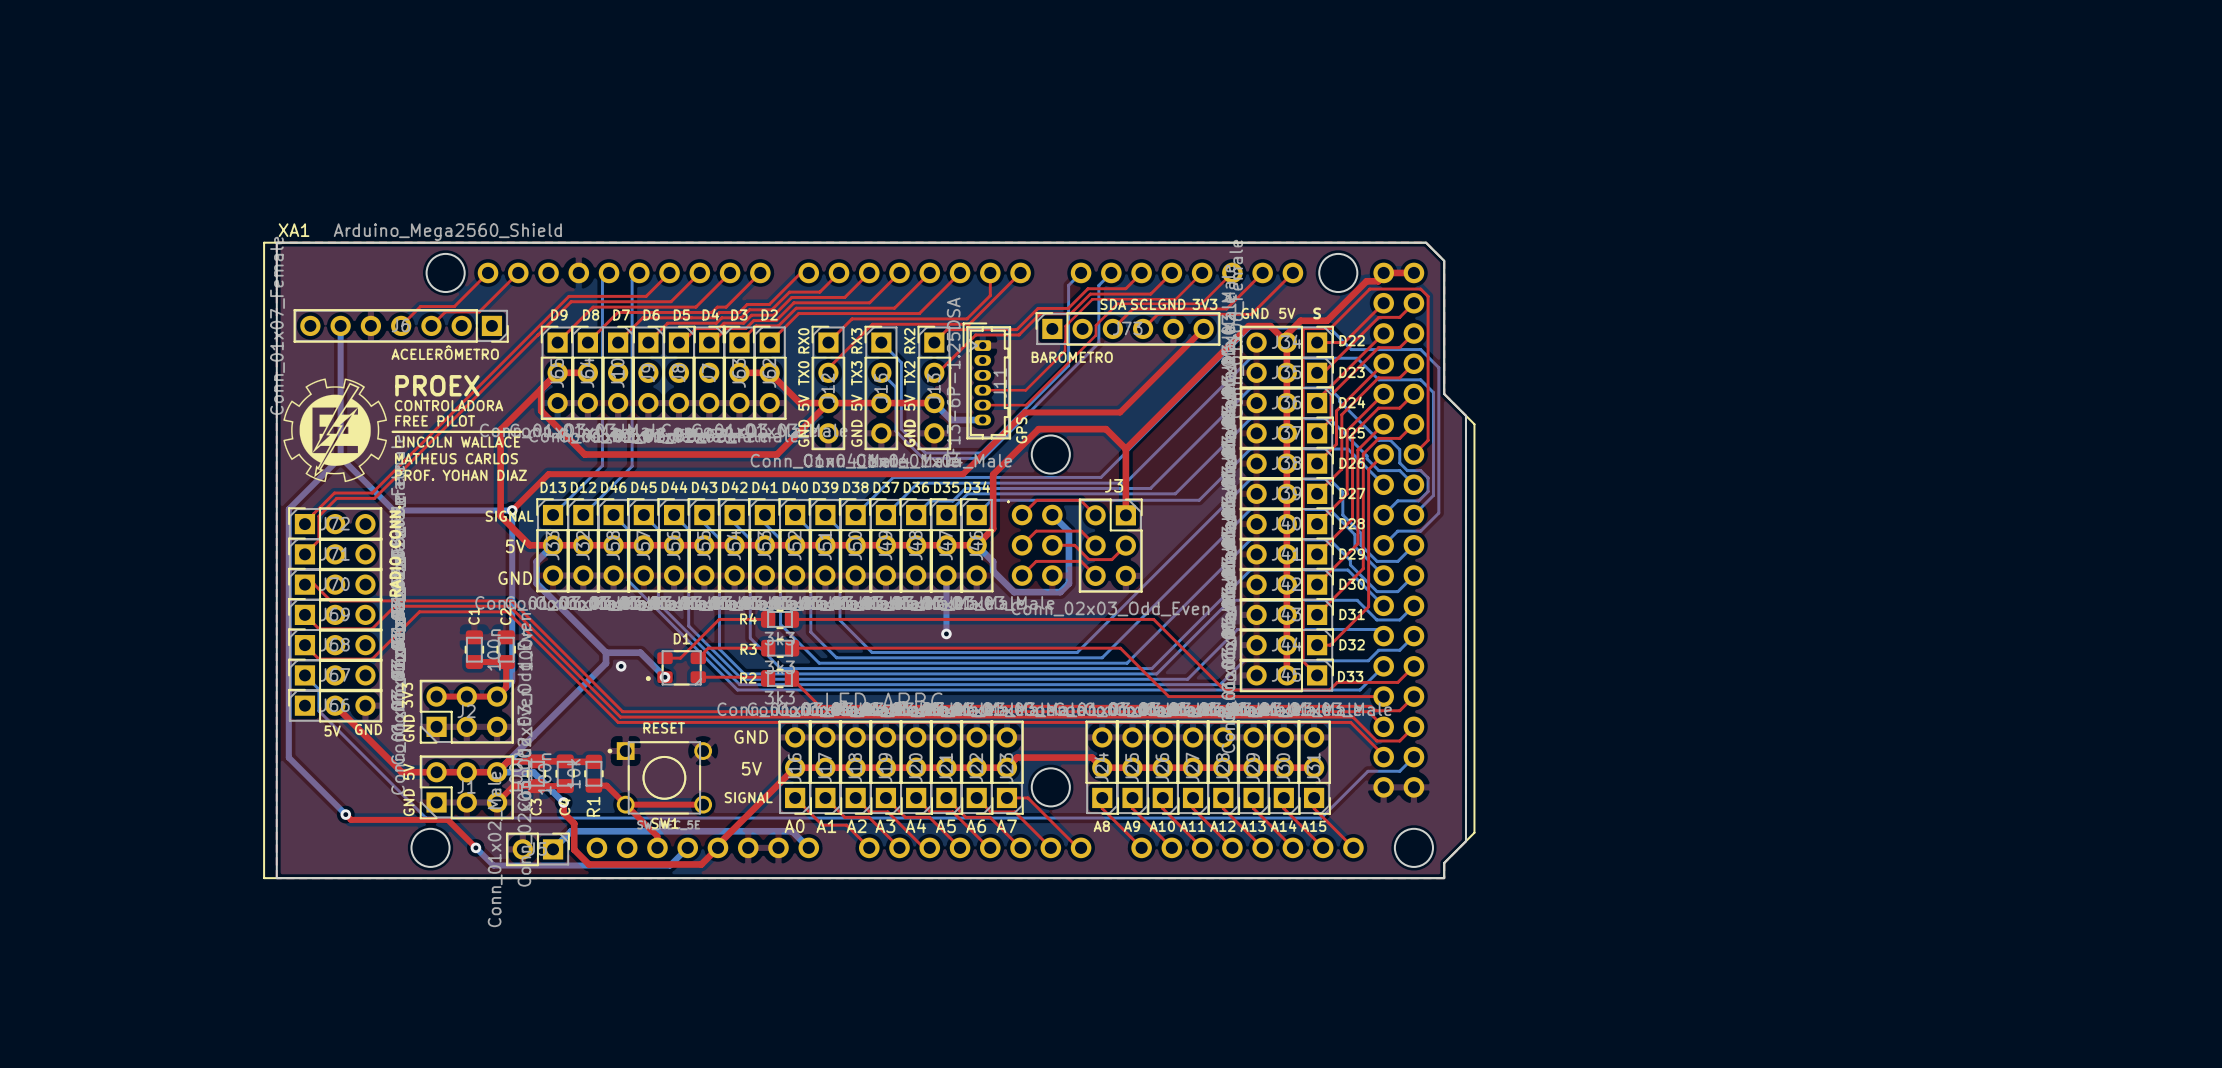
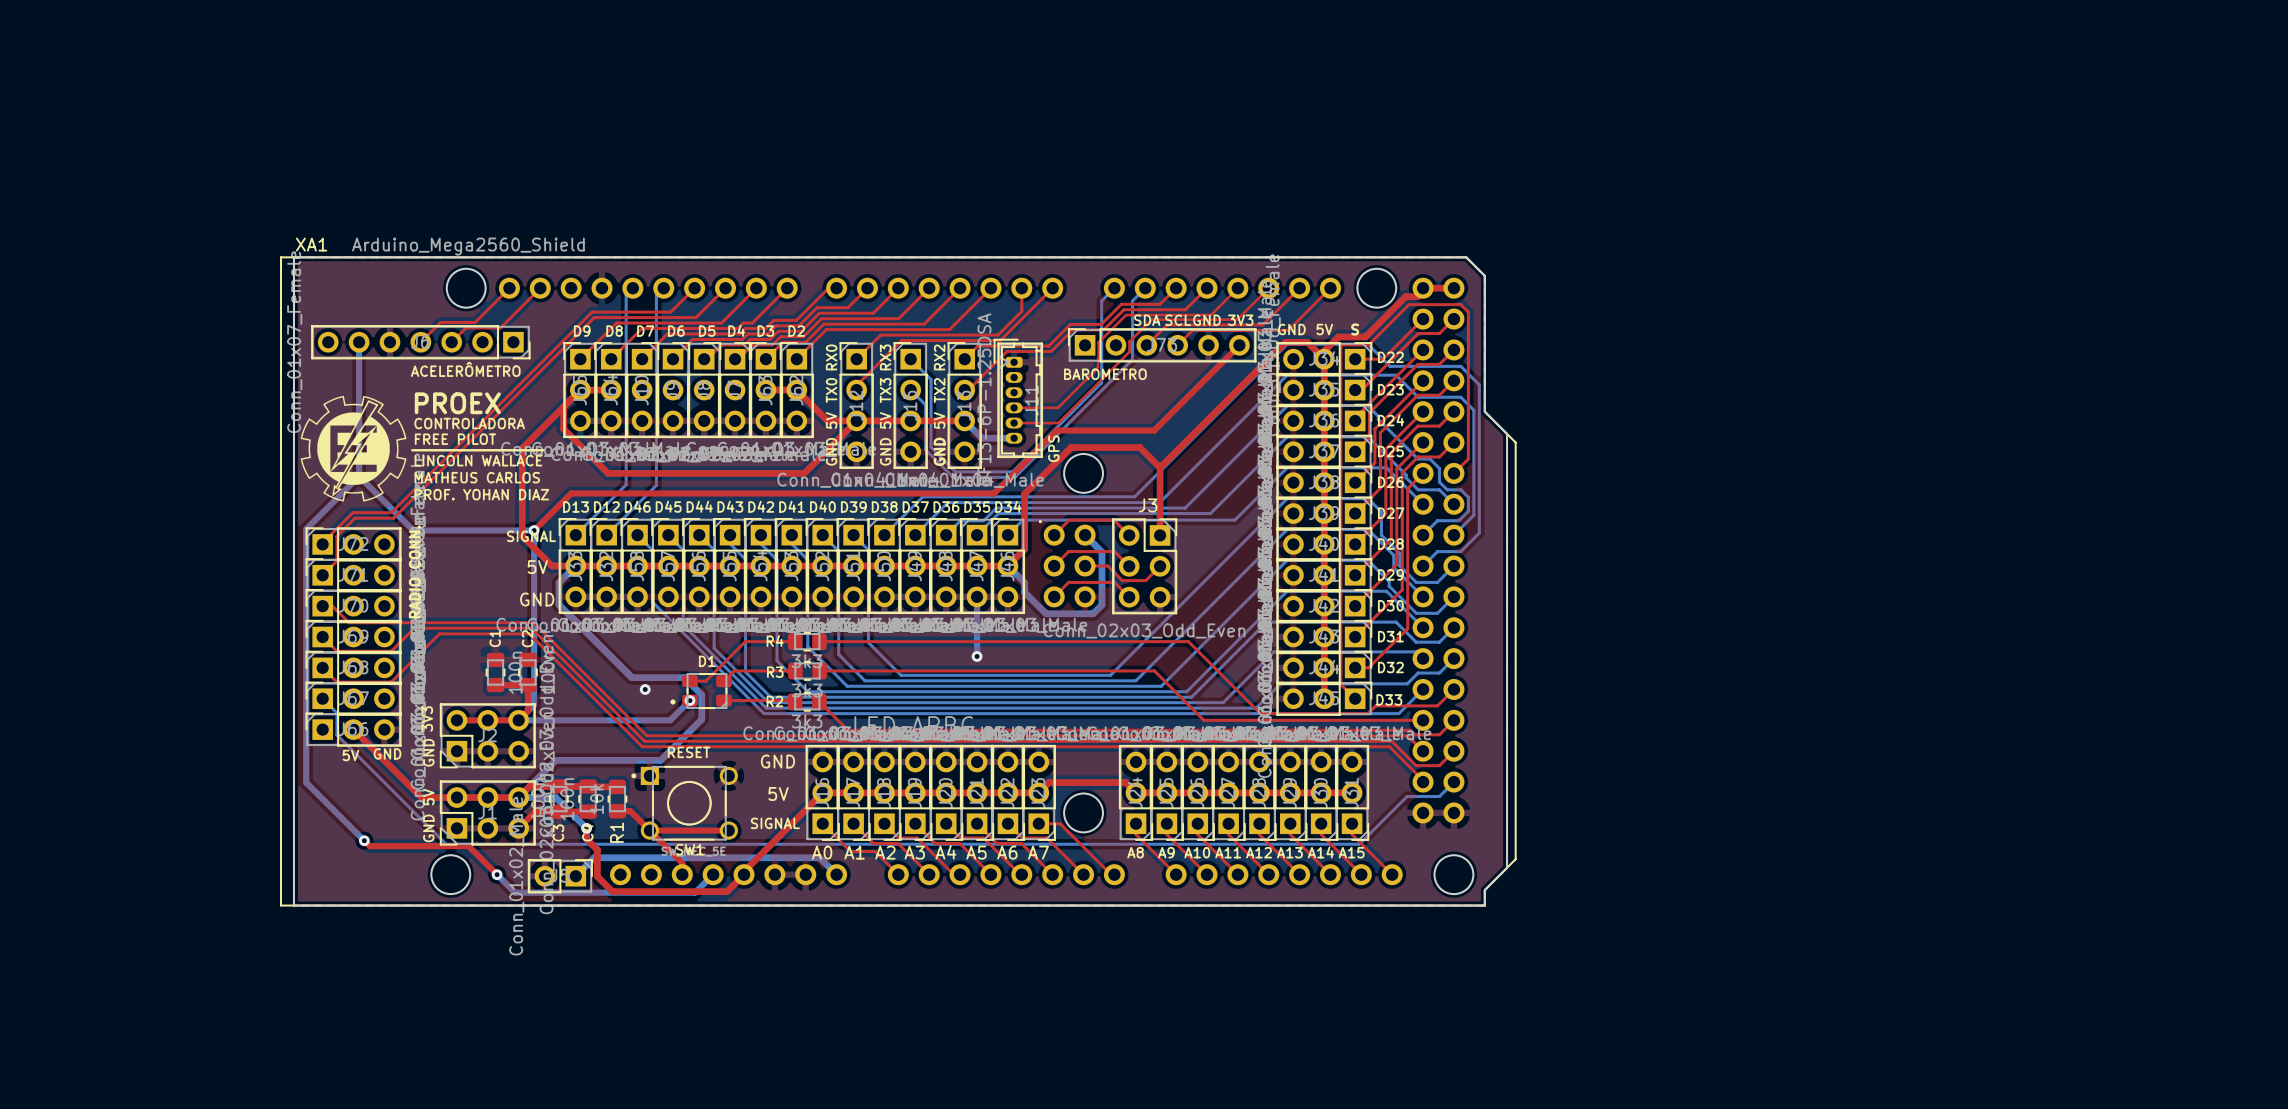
bottom track: none -> (567, 613) (631, 677) (684, 677) (701, 694) (701, 719) (660, 760) (555, 760)
bottom track: (664, 677) (640, 652) (606, 652) (606, 663) (533, 735) -> (689, 700) (670, 720) (518, 720)

